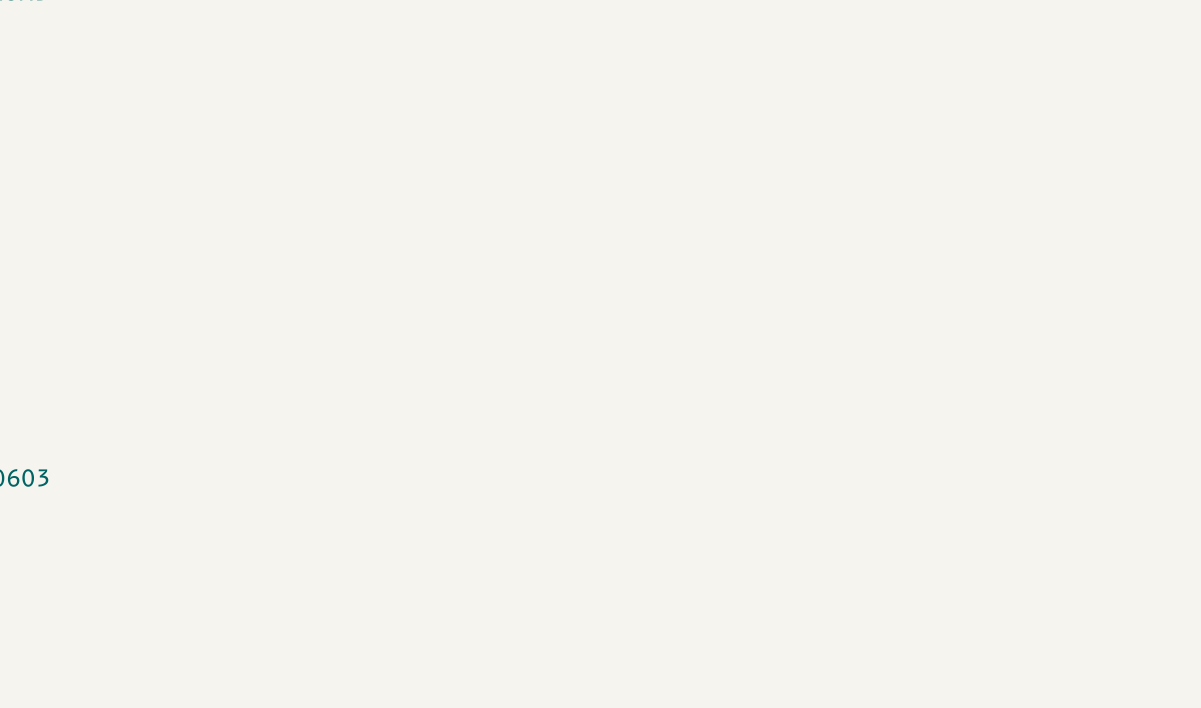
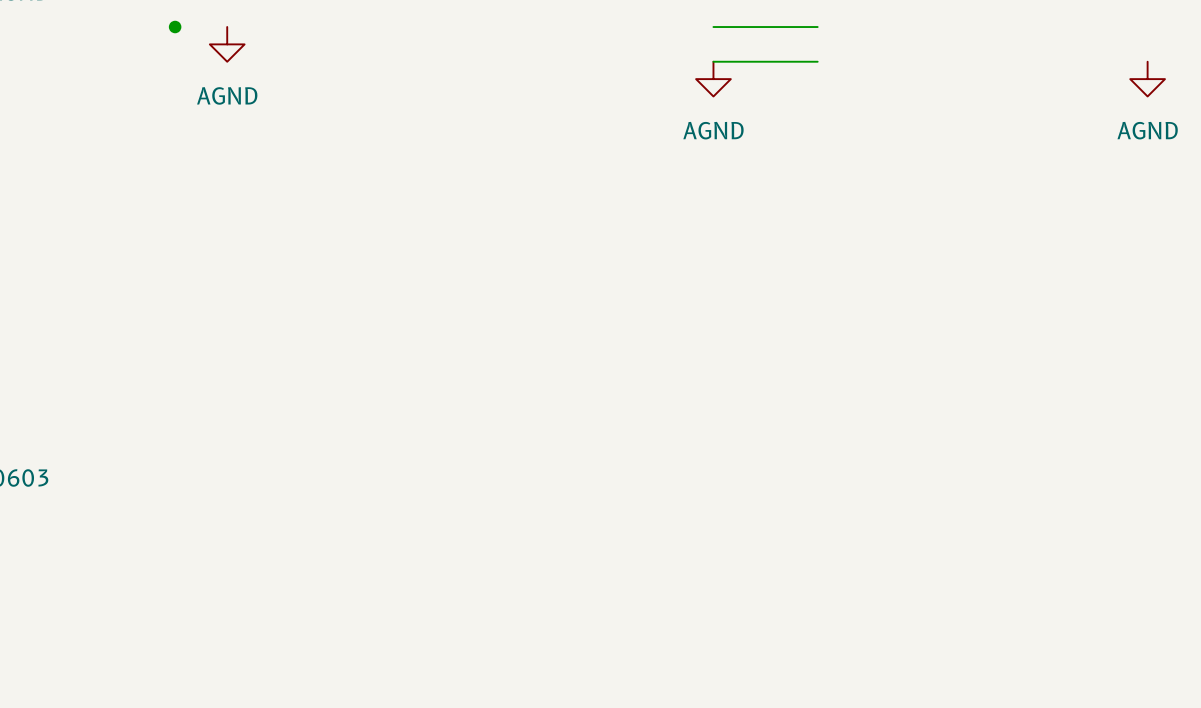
junction: none -> (175, 27)
wire: none -> (713, 27) (817, 27)
power symbol: none -> AGND (227, 44)
wire: none -> (713, 61) (817, 61)
power symbol: none -> AGND (713, 79)
power symbol: none -> AGND (1147, 79)

